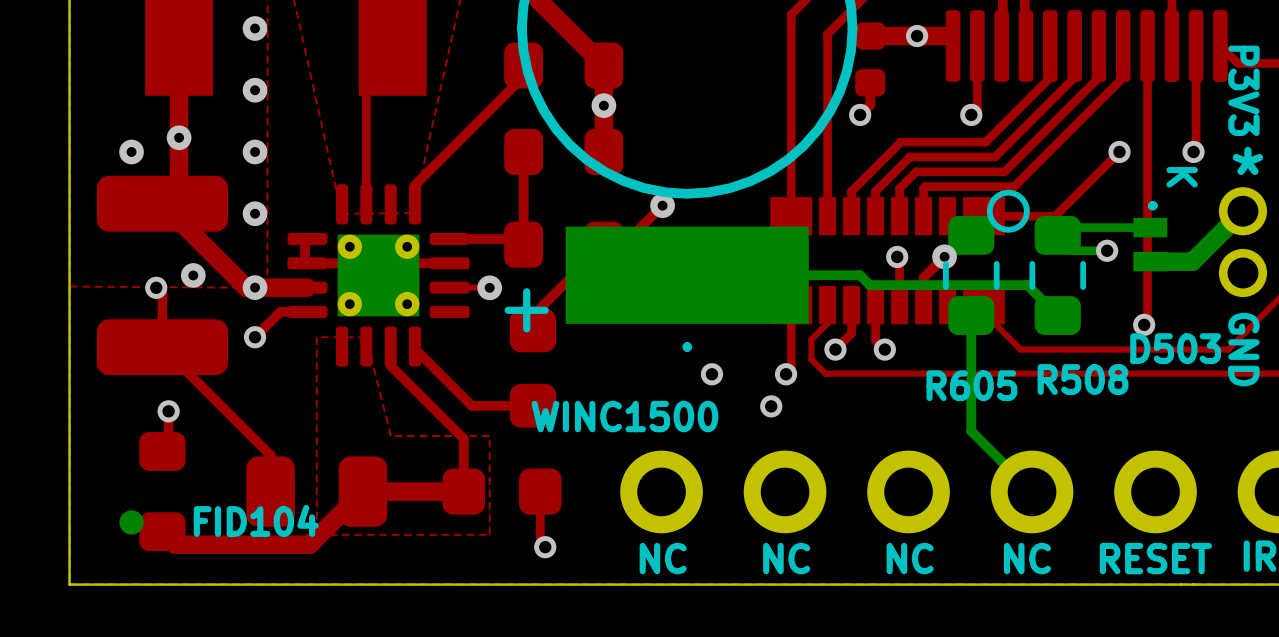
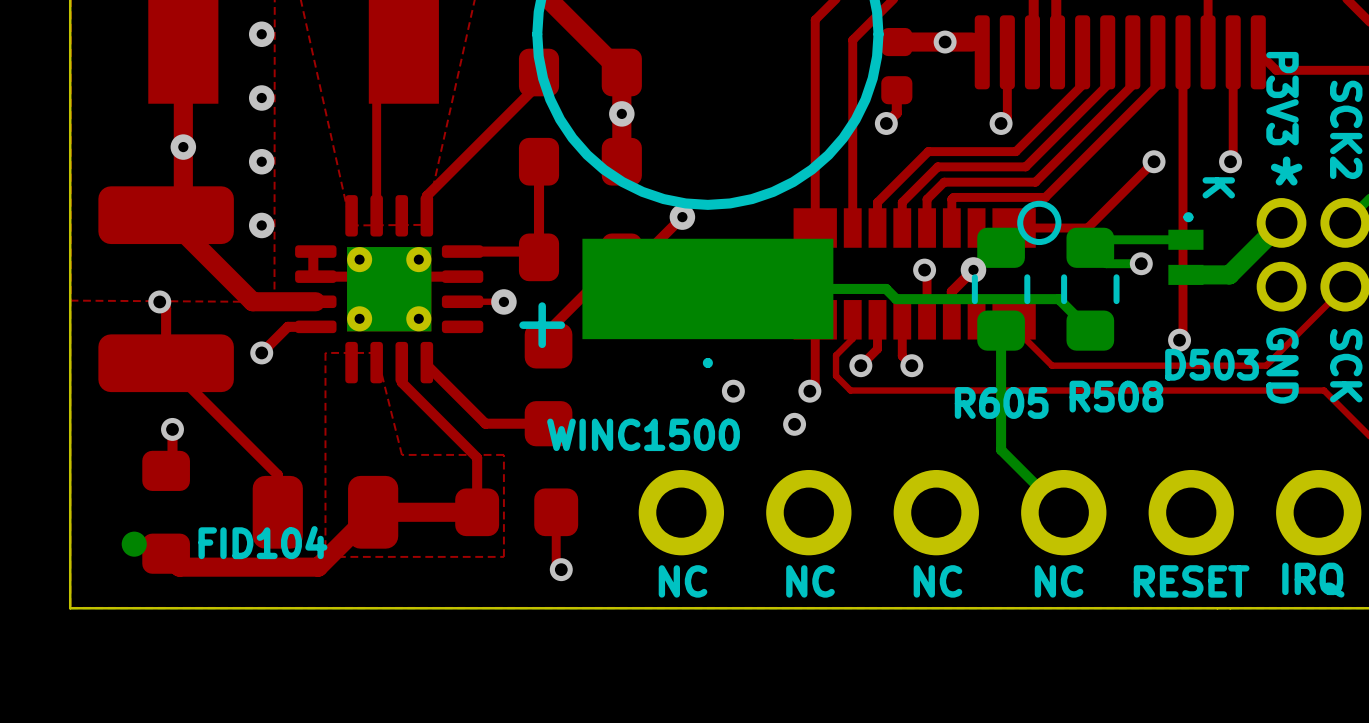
via: (131, 151) -> none
via: (193, 275) -> none
via: (255, 287) -> none

